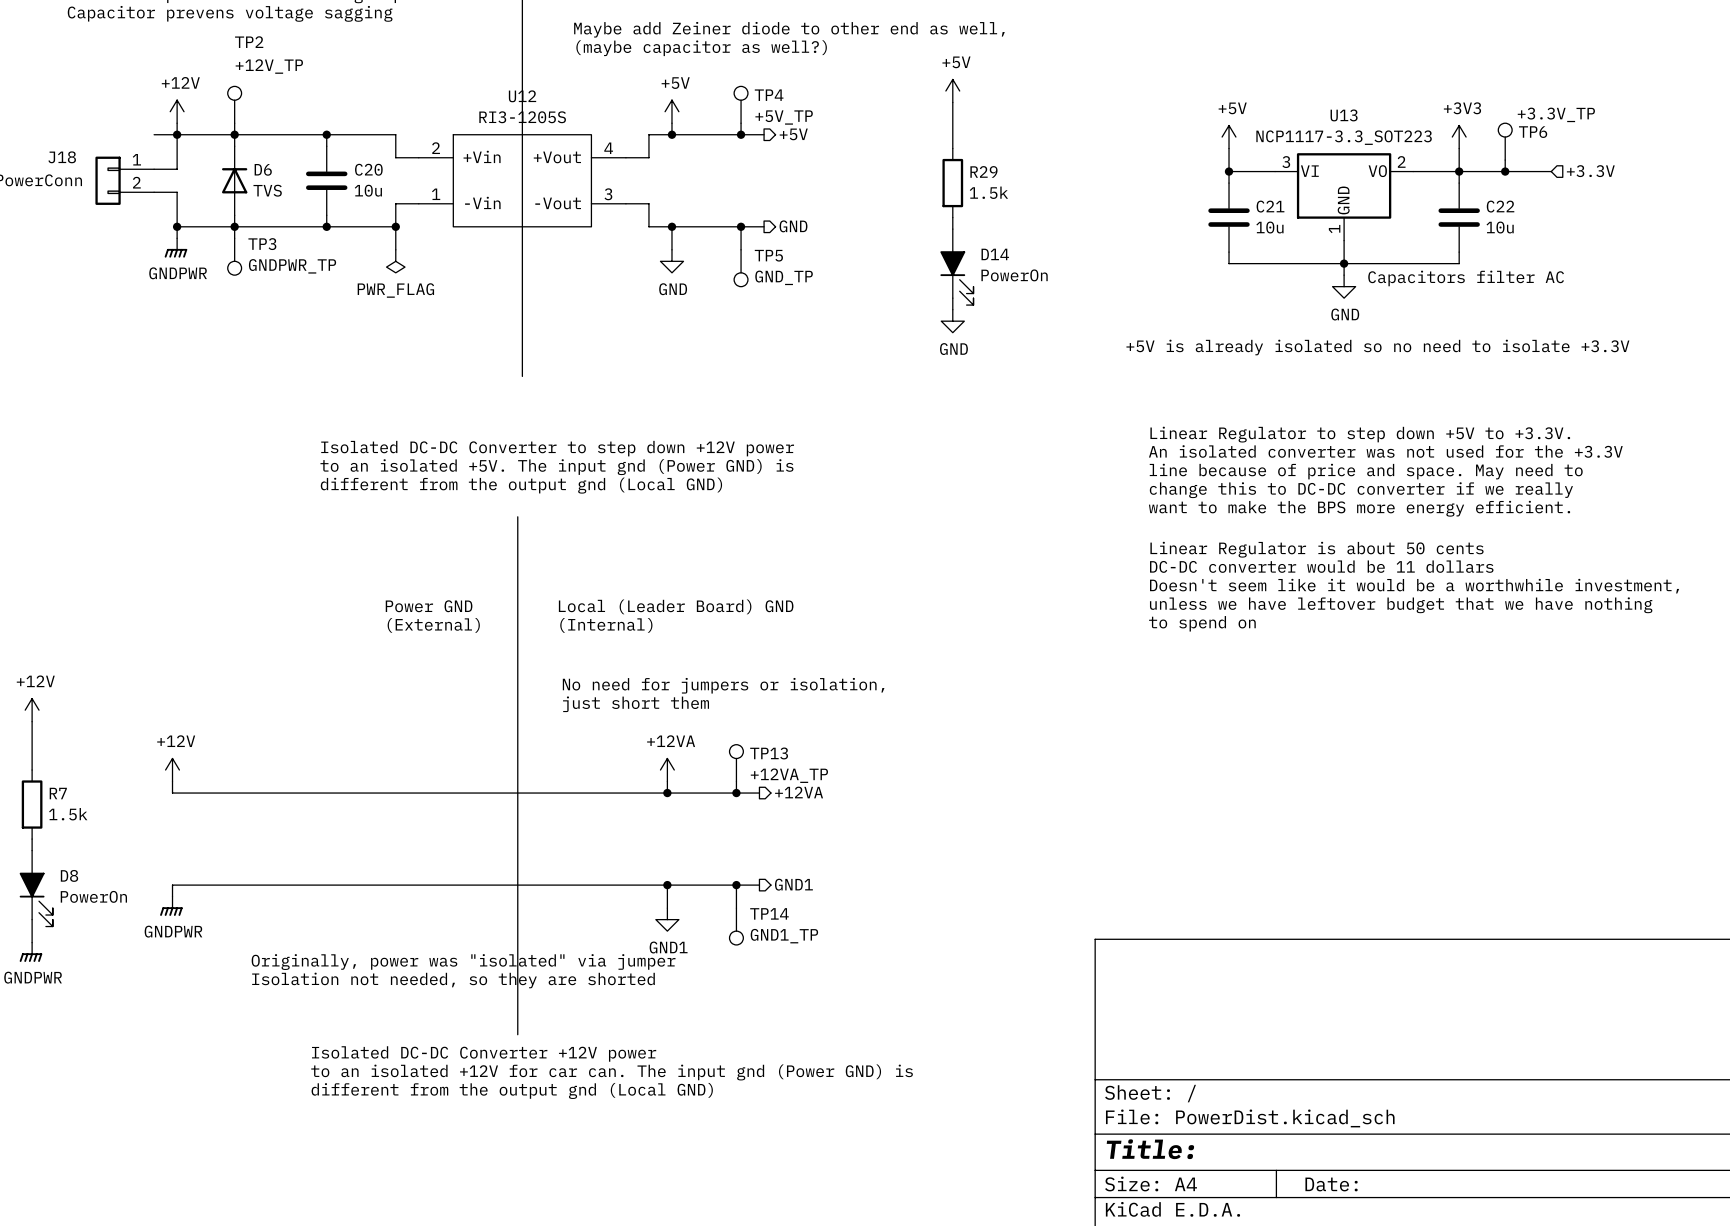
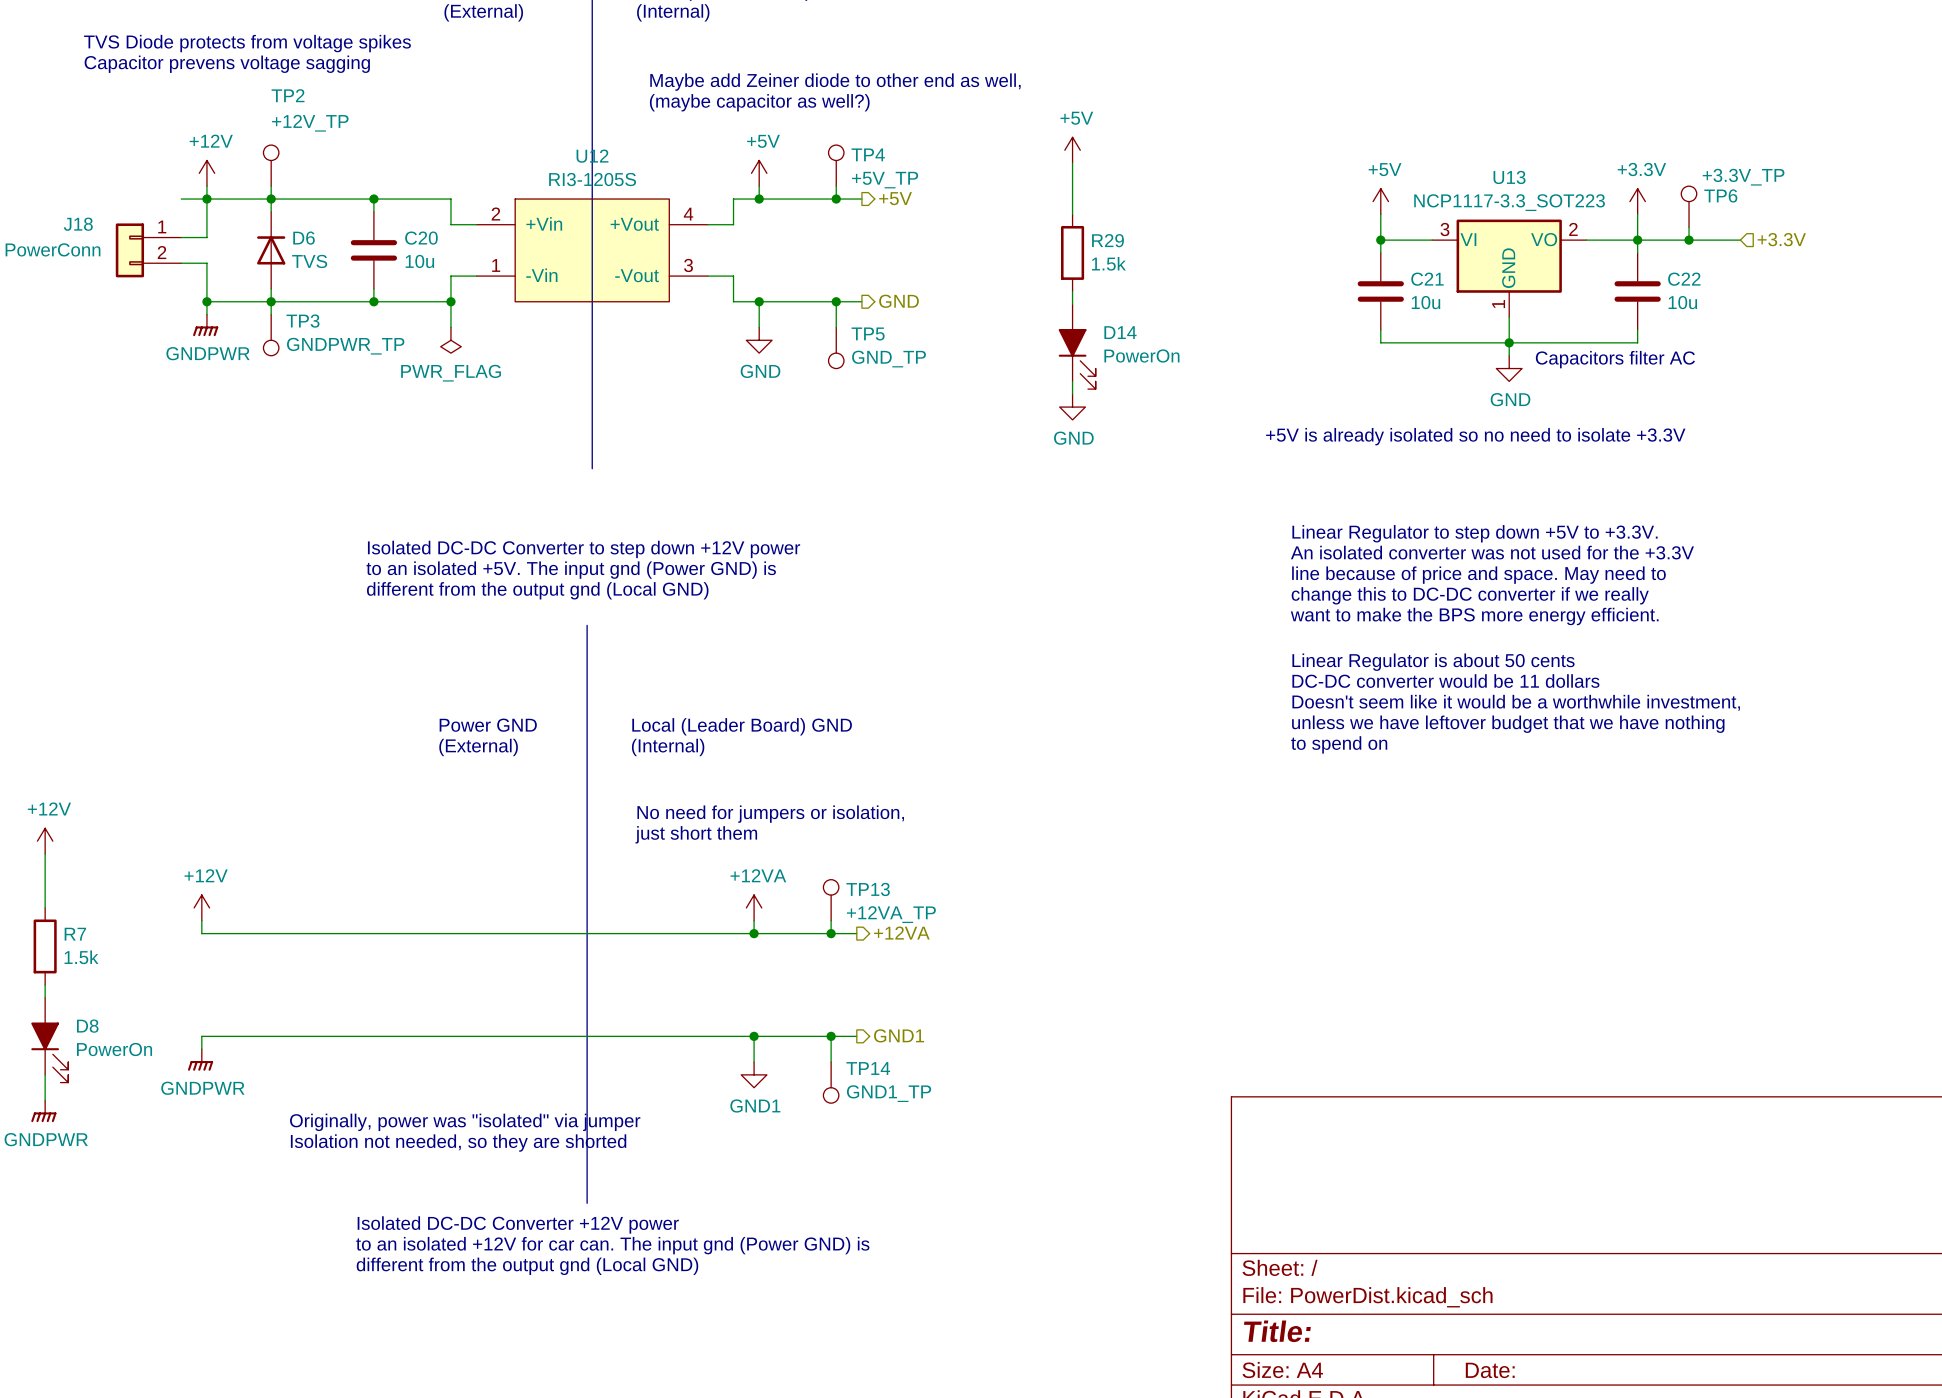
power symbol: +3V3 (1459, 137) -> +3.3V (1637, 201)

